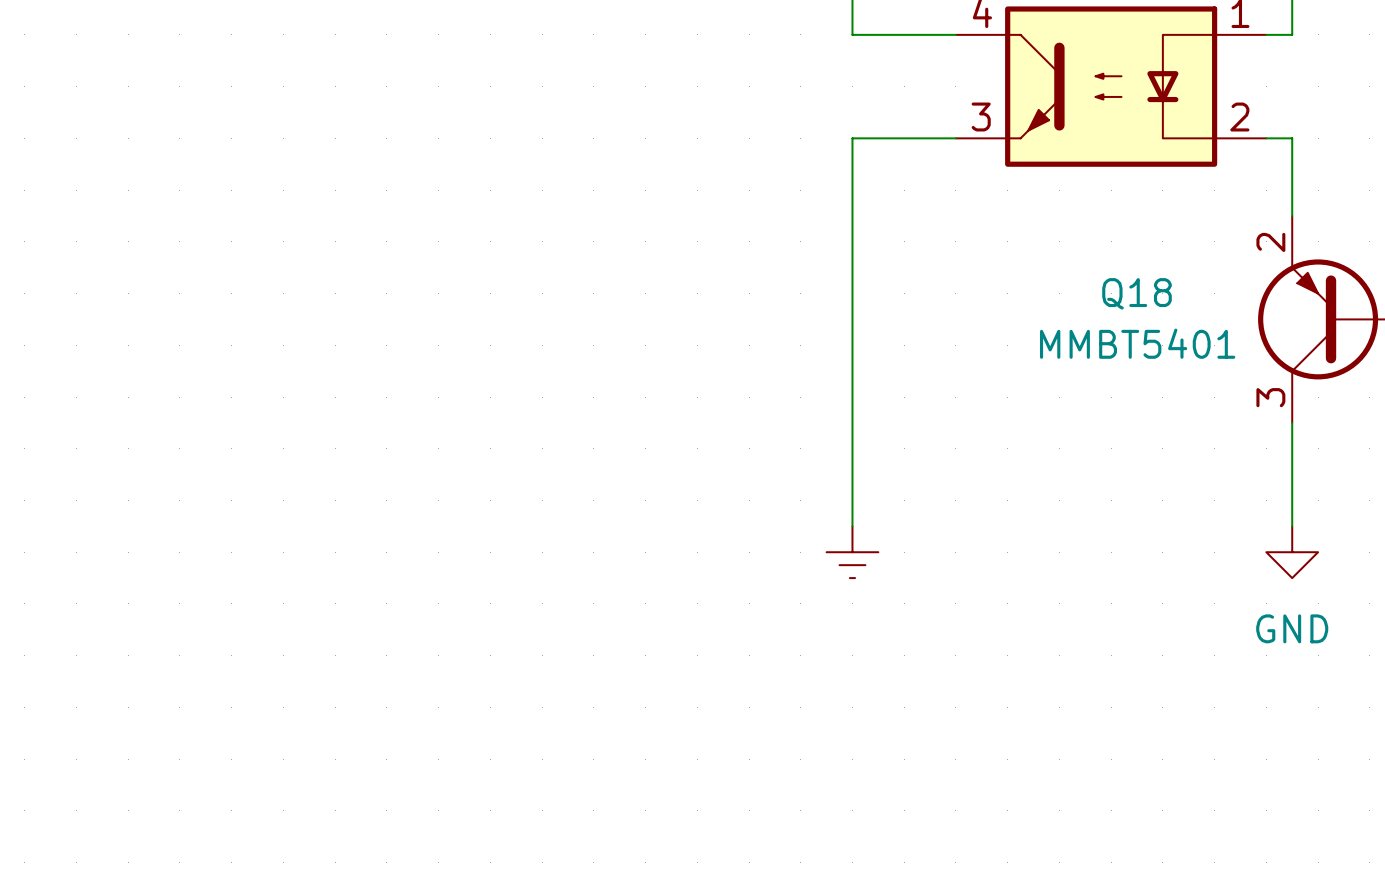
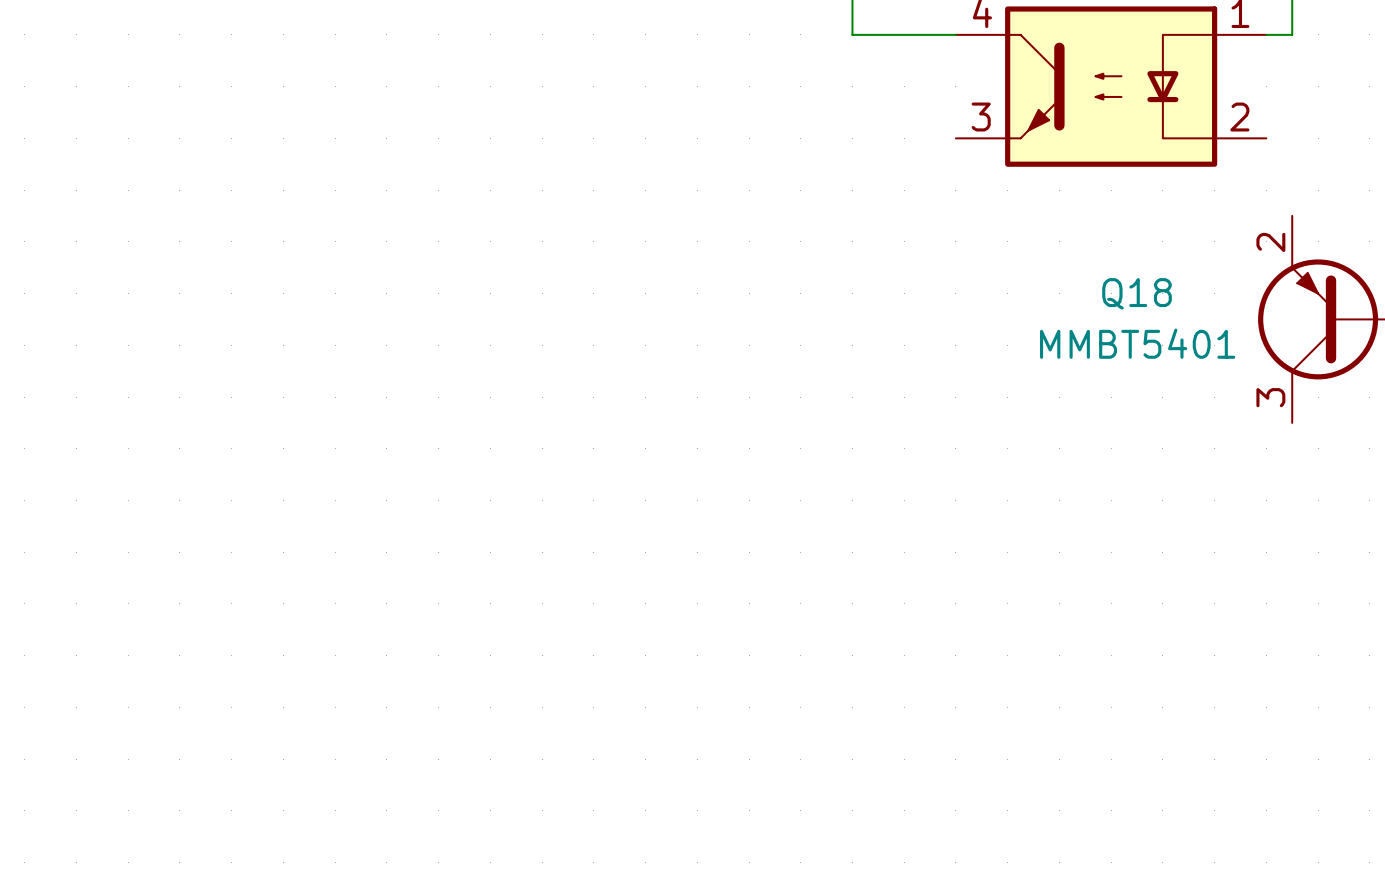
wire: (955, 138) (852, 138) (852, 526) -> none
wire: (1266, 138) (1292, 138) (1292, 215) -> none
wire: (1292, 422) (1292, 526) -> none
power symbol: (852, 552) -> none
power symbol: GND (1292, 552) -> none

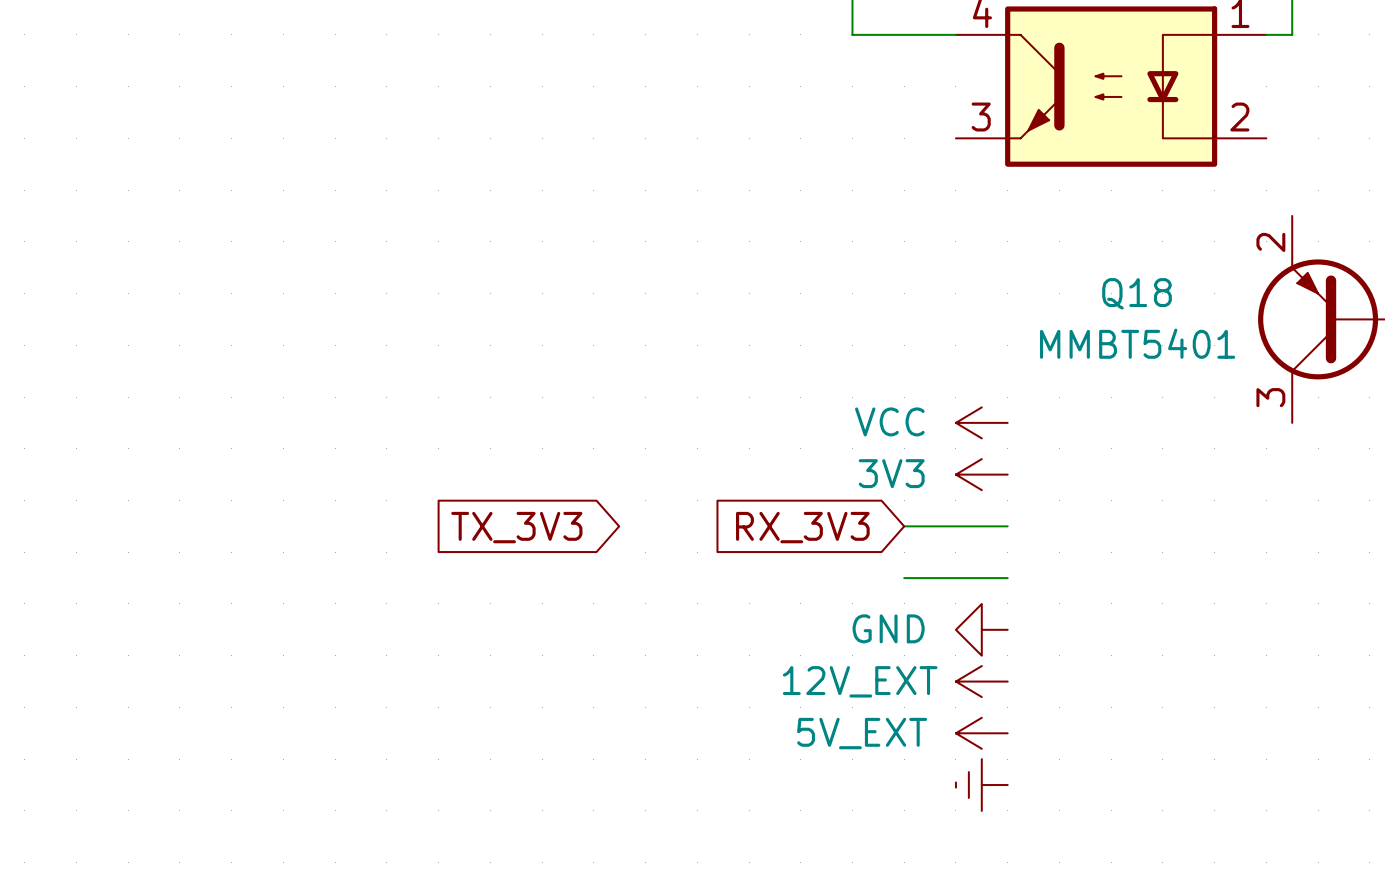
power symbol: none -> VCC (981, 422)
power symbol: none -> 3V3 (981, 474)
wire: none -> (904, 526) (1007, 526)
global label: none -> TX_3V3 (516, 527)
global label: none -> RX_3V3 (802, 527)
wire: none -> (904, 578) (1007, 578)
power symbol: none -> GND (981, 629)
power symbol: none -> 12V_EXT (981, 681)
power symbol: none -> 5V_EXT (981, 733)
power symbol: none -> (981, 785)

